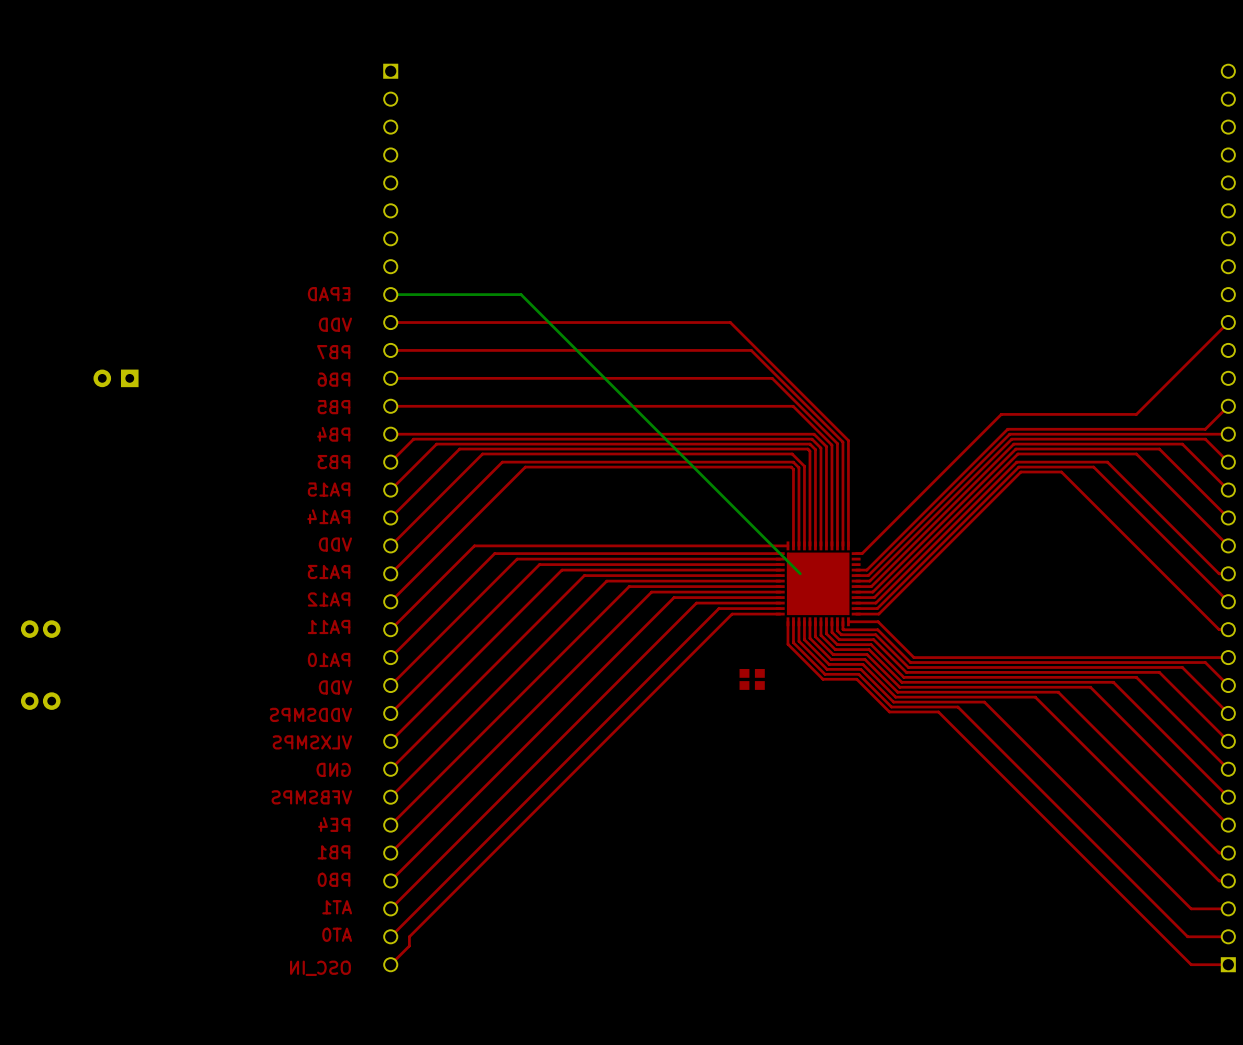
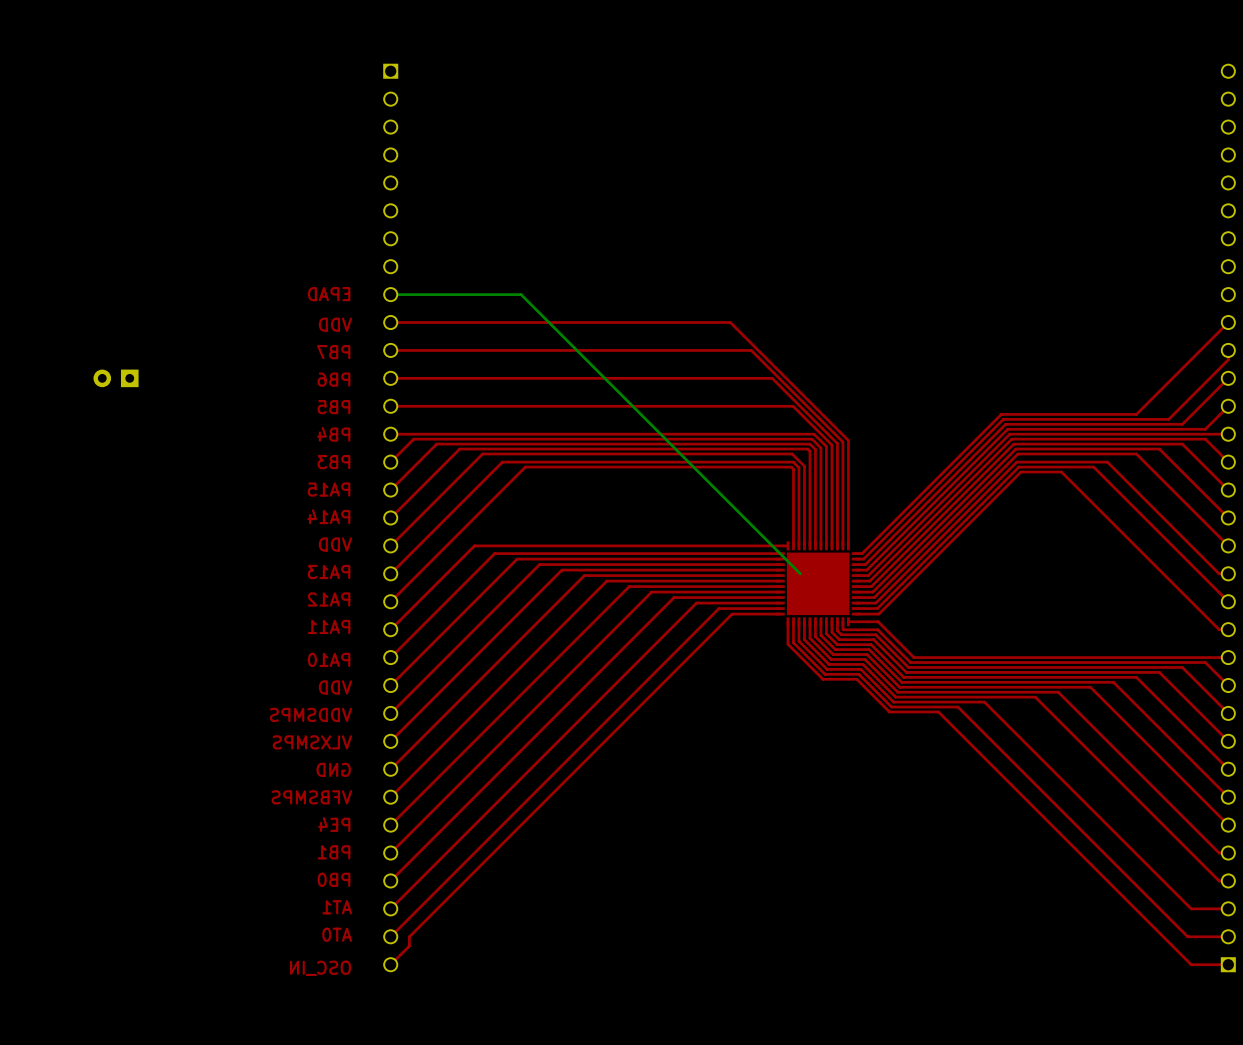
top track: none -> (1228, 350) (1228, 359) (1168, 419) (1003, 419) (863, 559) (856, 559)
top track: none -> (1228, 378) (1182, 424) (1005, 424) (865, 564) (856, 564)
part: (40, 629) -> none
part: (752, 679) -> none
part: (40, 701) -> none

